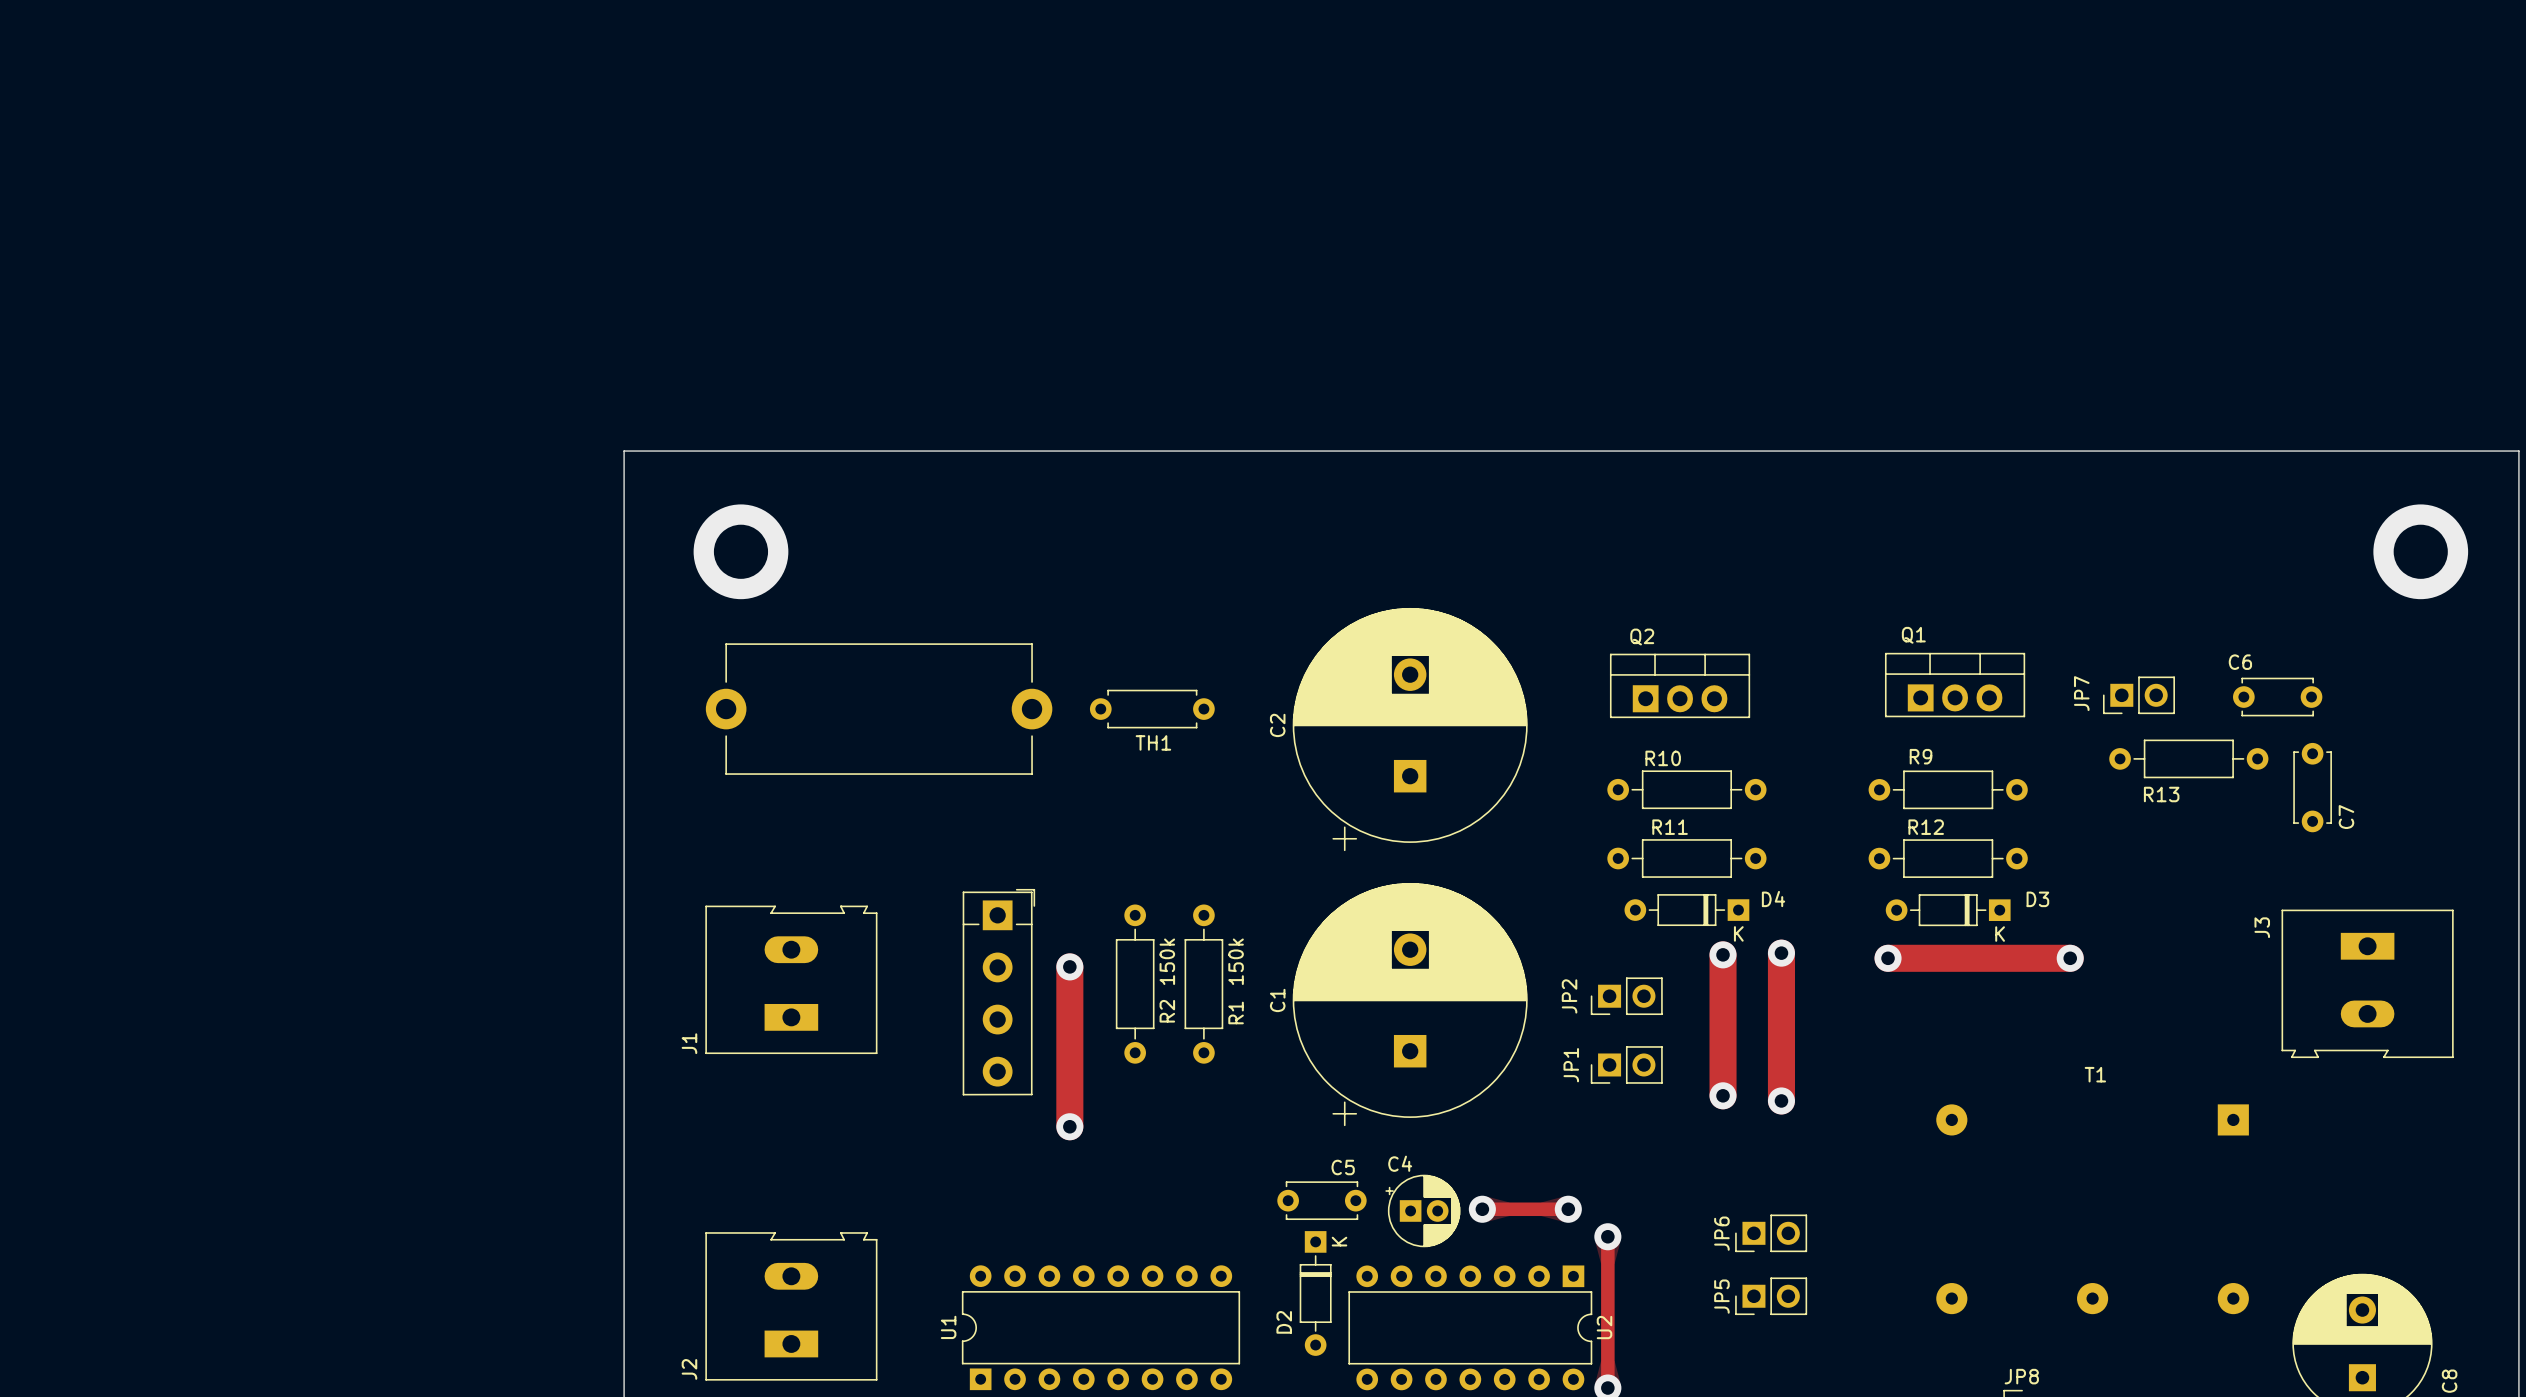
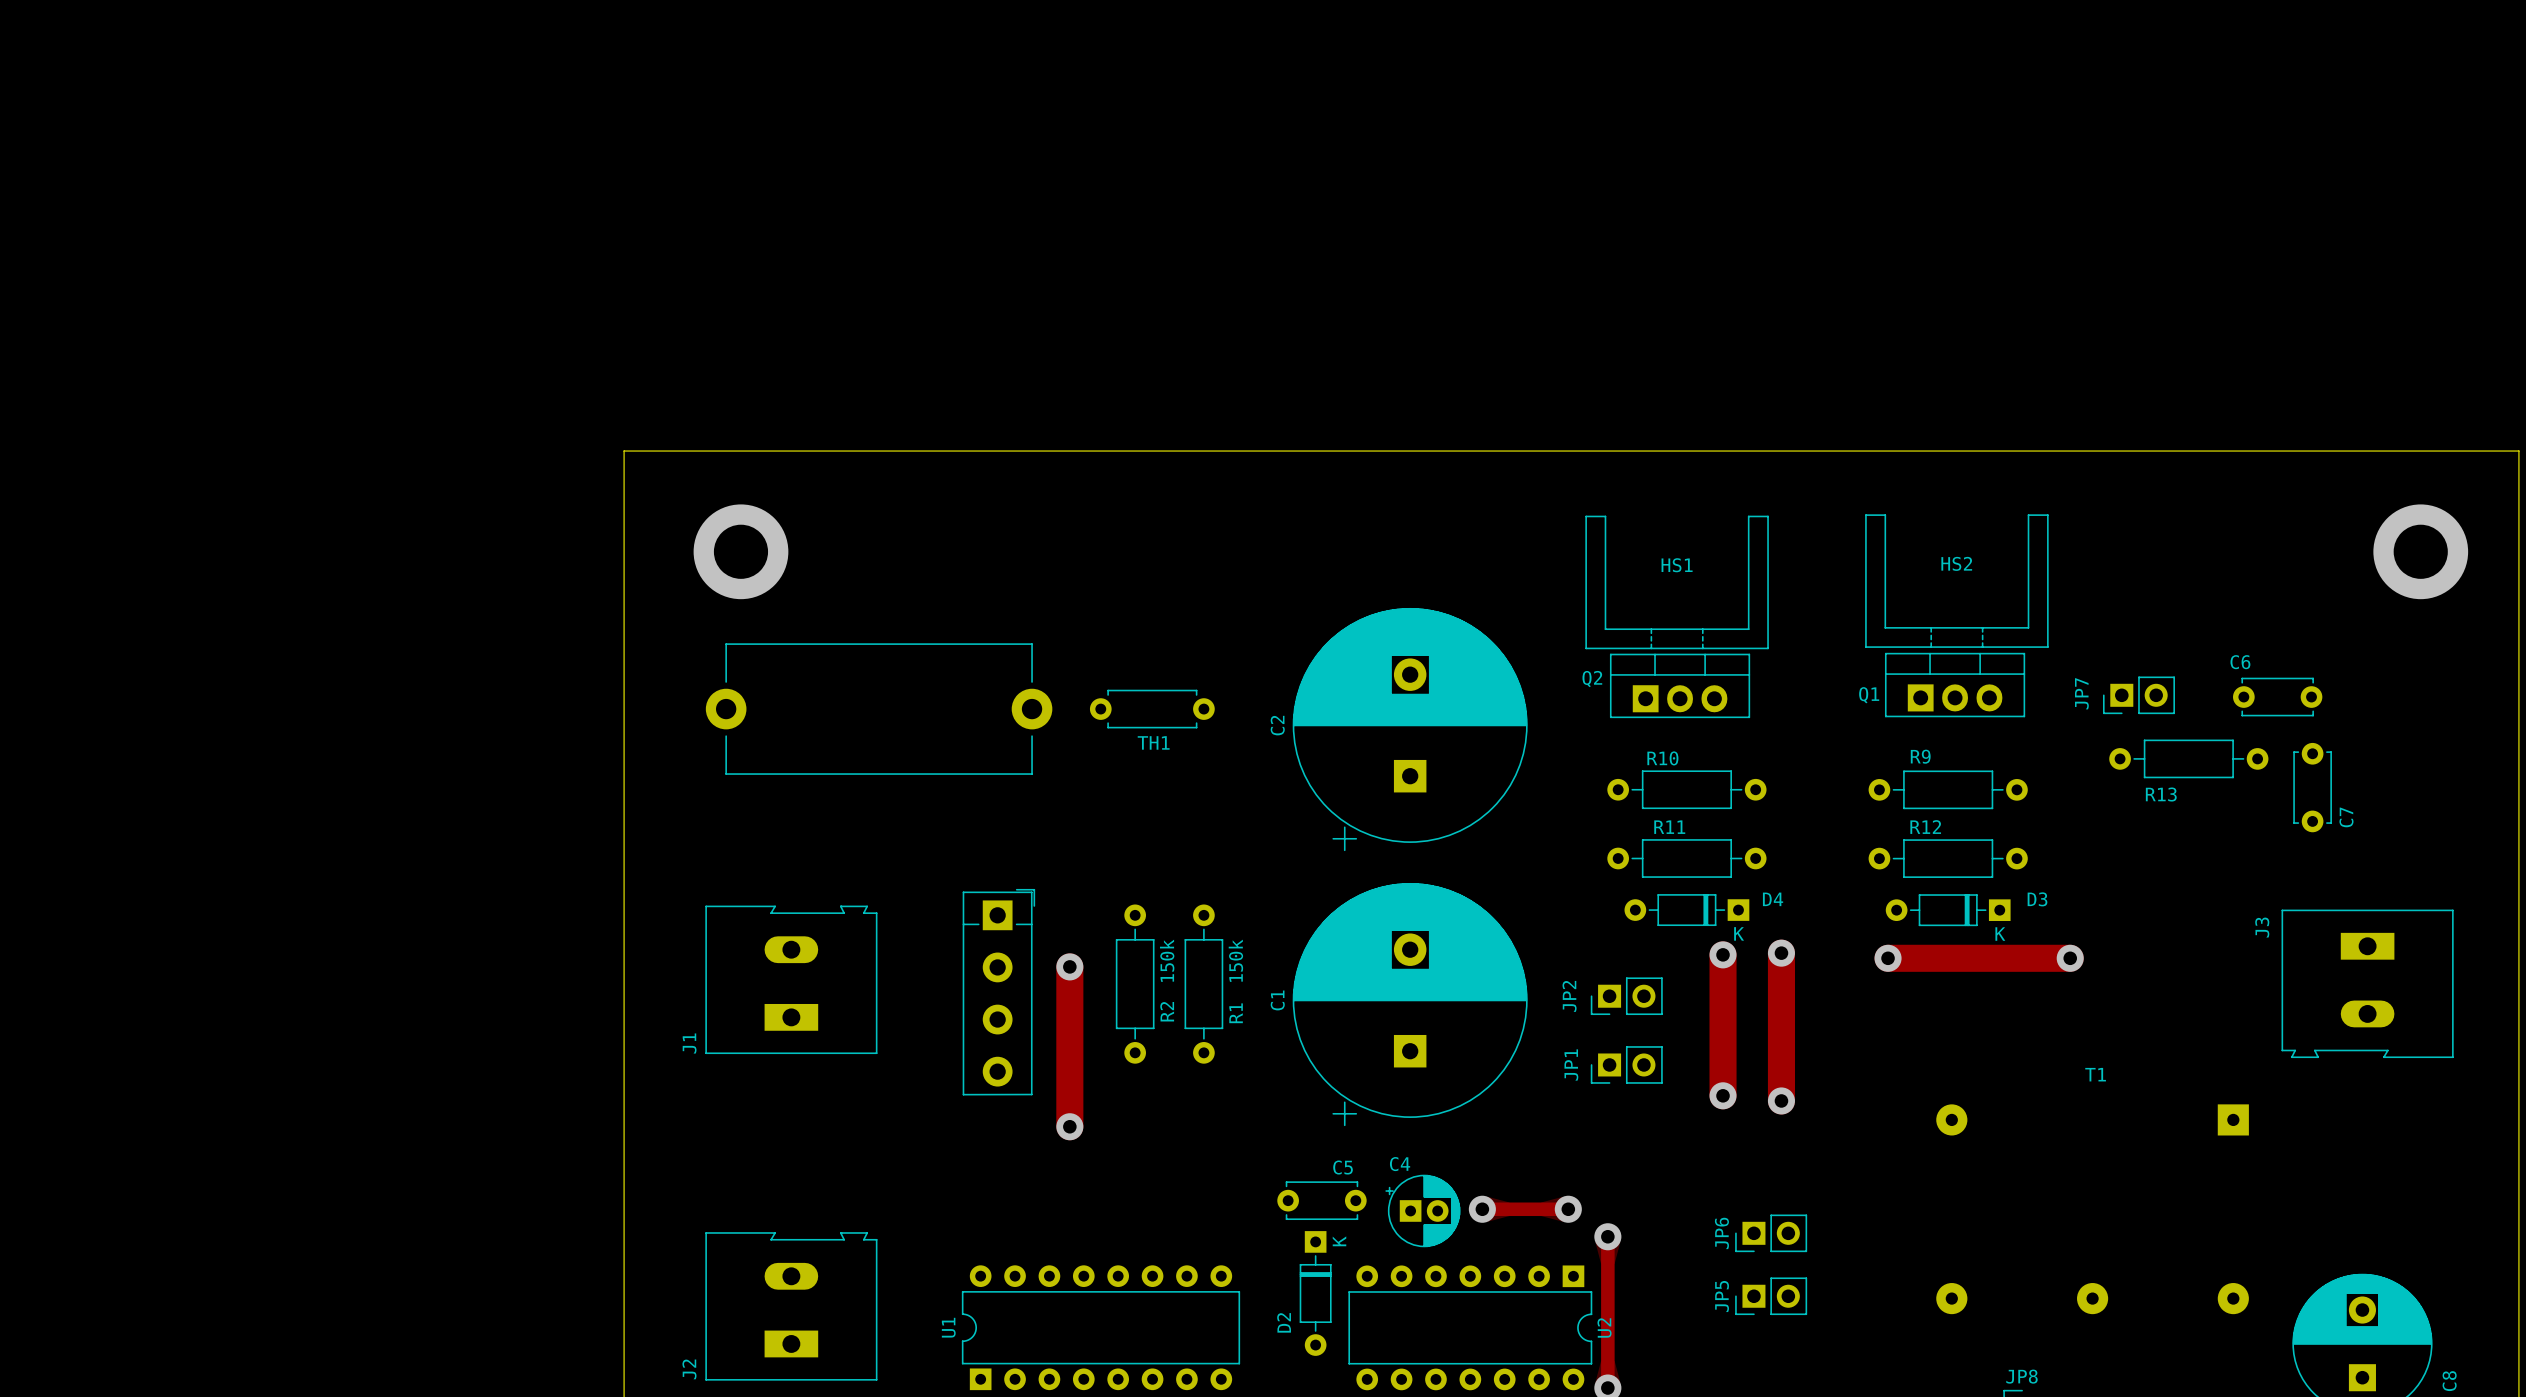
HS2: none -> (1956, 581)
HS1: none -> (1677, 582)
Q1 name position: Q1 (1913, 635) -> Q1 (1869, 695)
Q2 name position: Q2 (1642, 637) -> Q2 (1592, 679)

